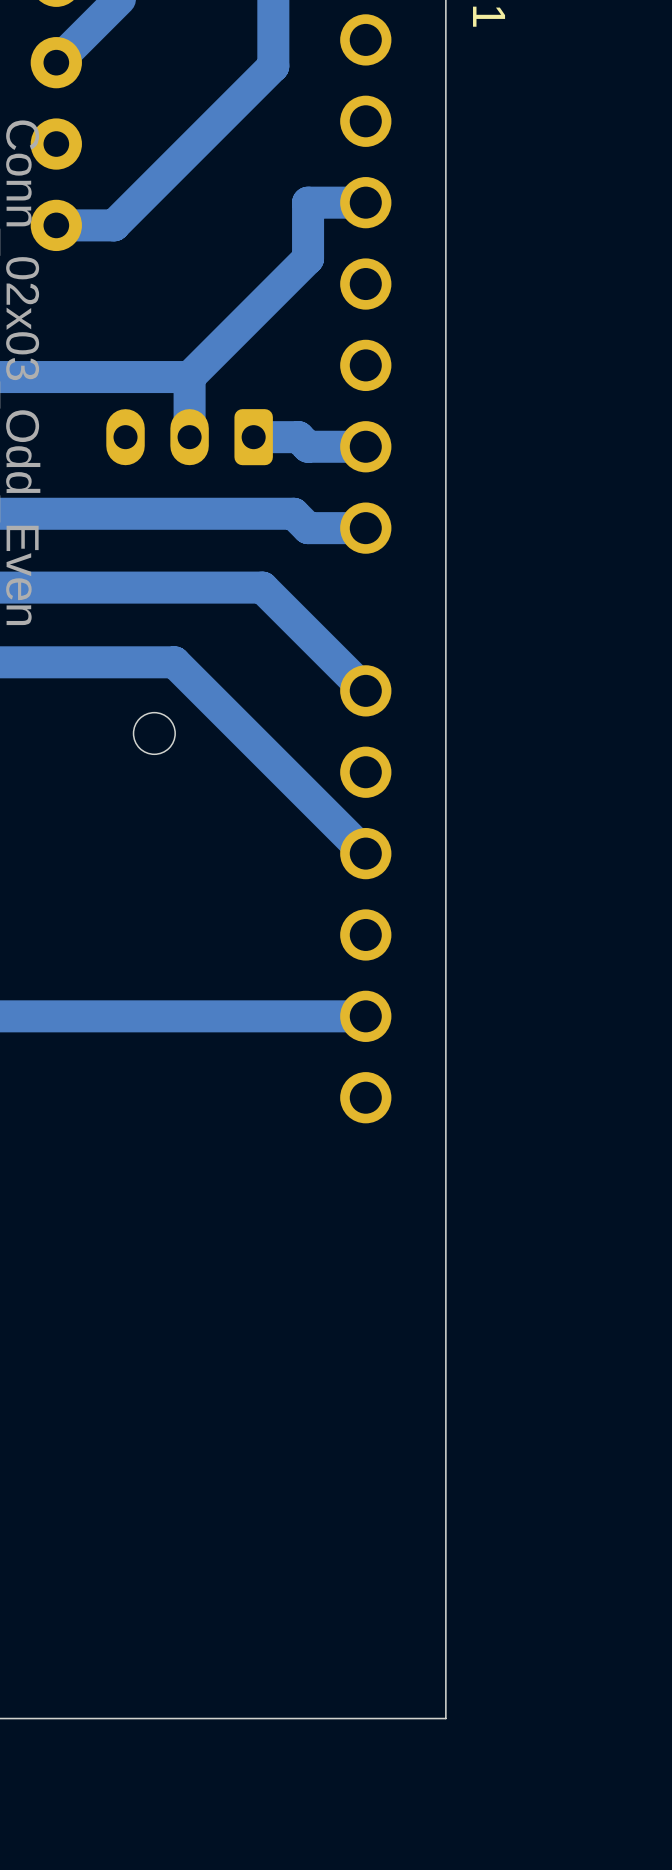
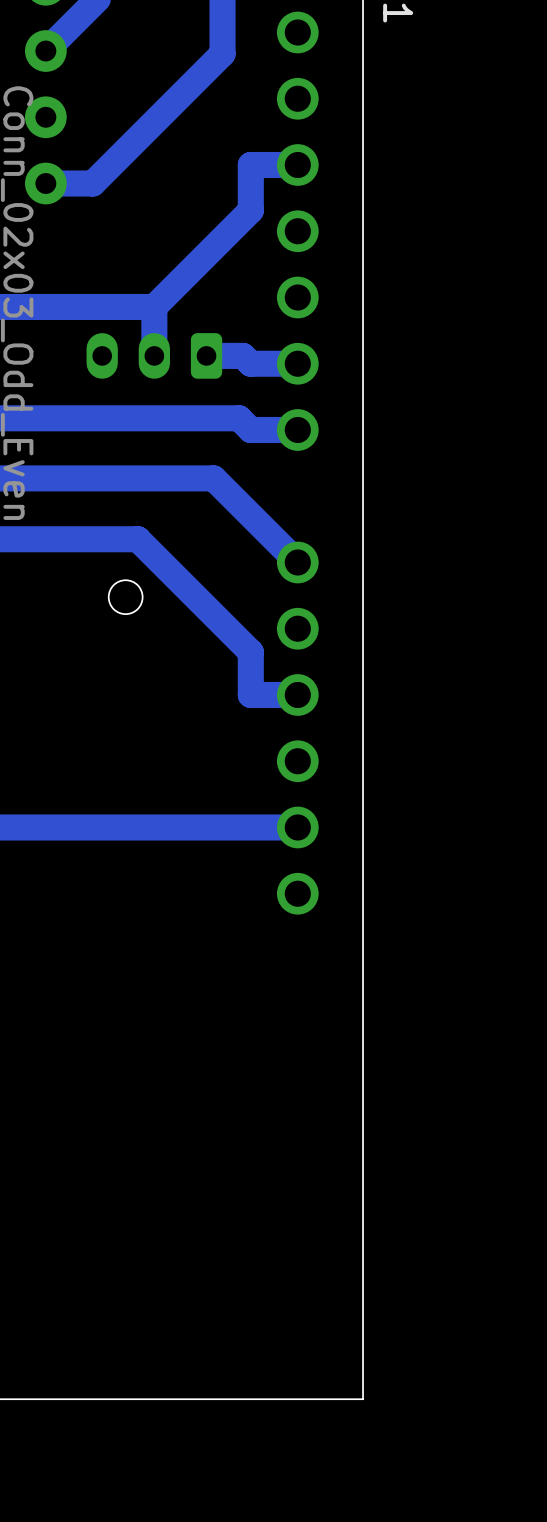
track: (169, 662) (174, 662) (365, 853) -> (137, 539) (250, 652) (250, 694) (297, 694)

